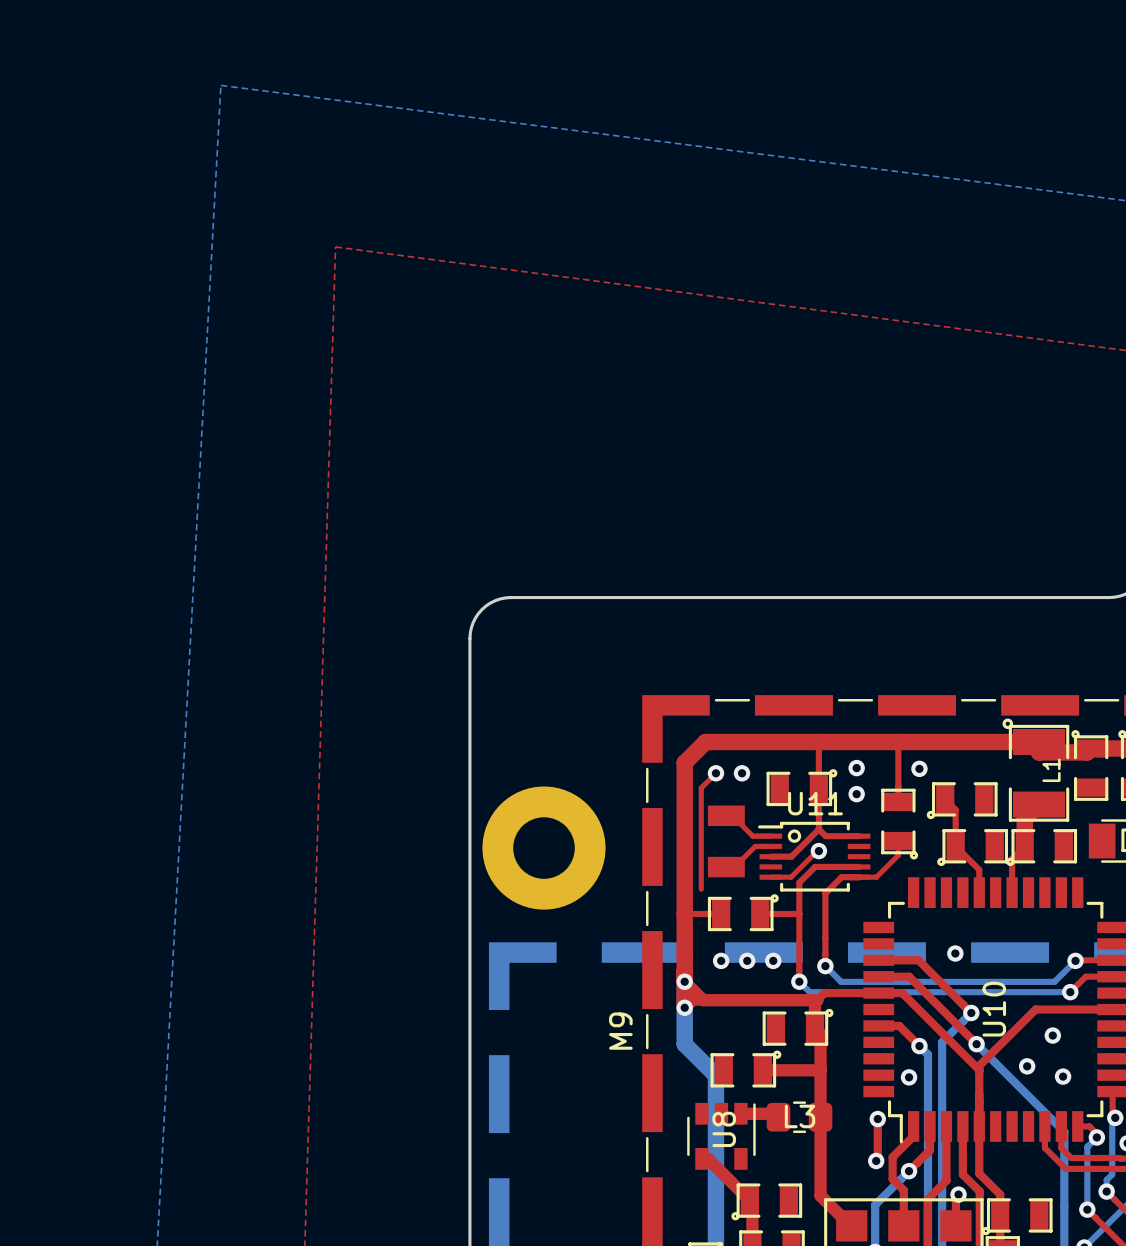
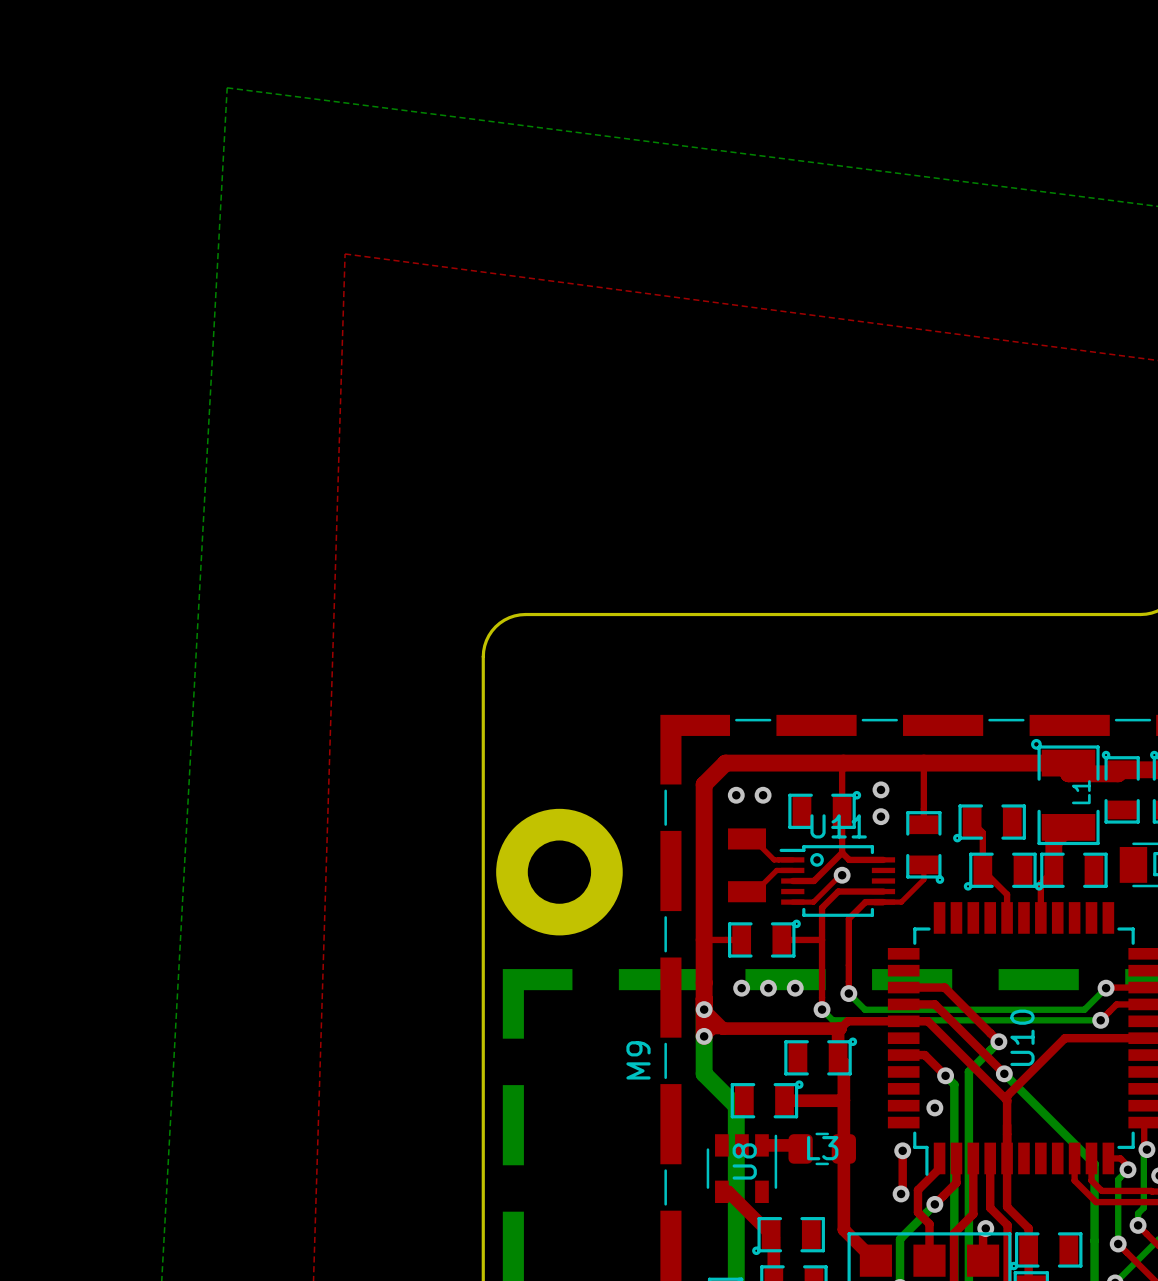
via: (919, 768) -> none
top track: (715, 773) (701, 788) (701, 889) -> none
via: (955, 953) -> none
via: (1052, 1035) -> none
via: (1027, 1066) -> none
via: (1063, 1076) -> none

